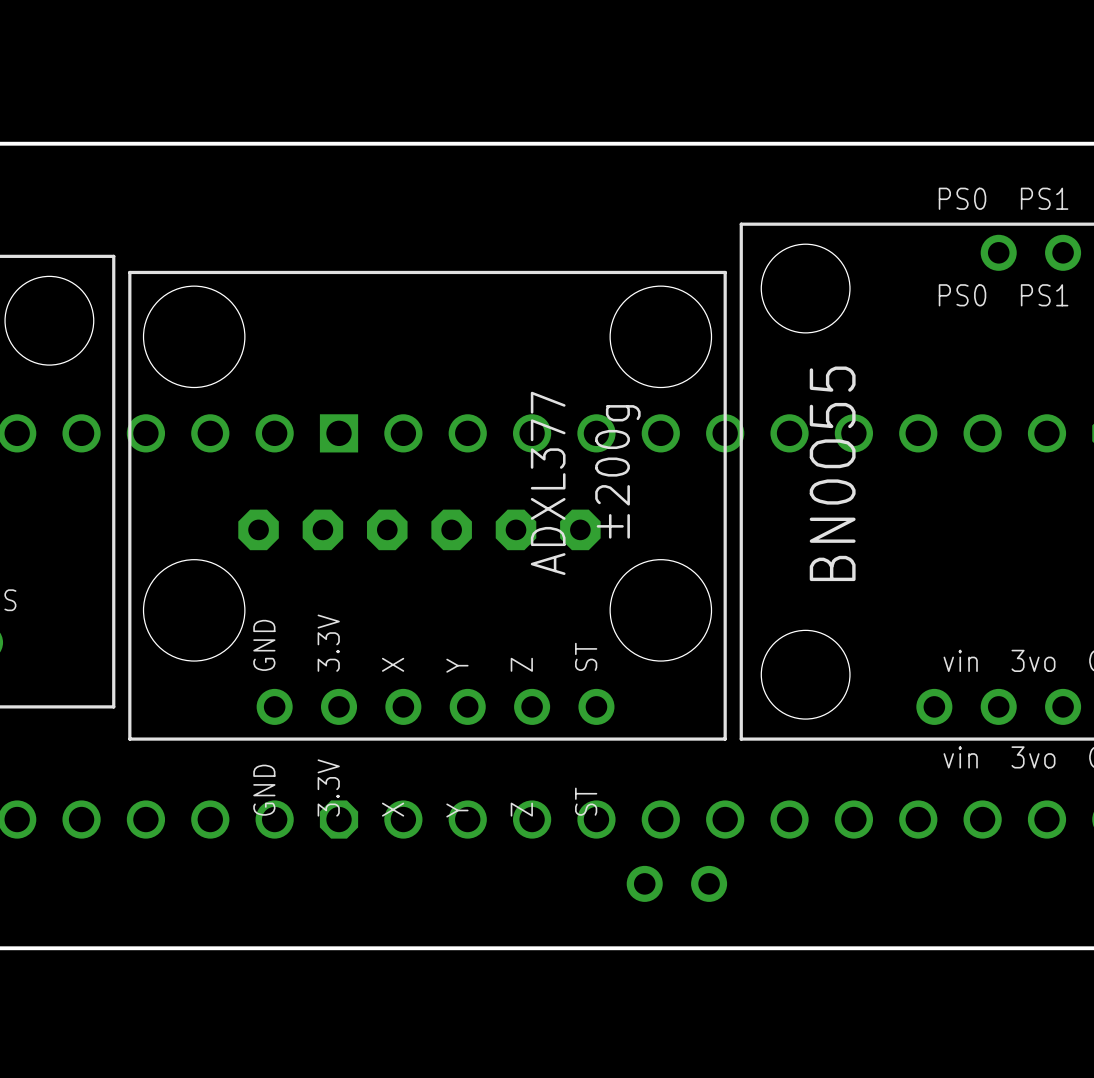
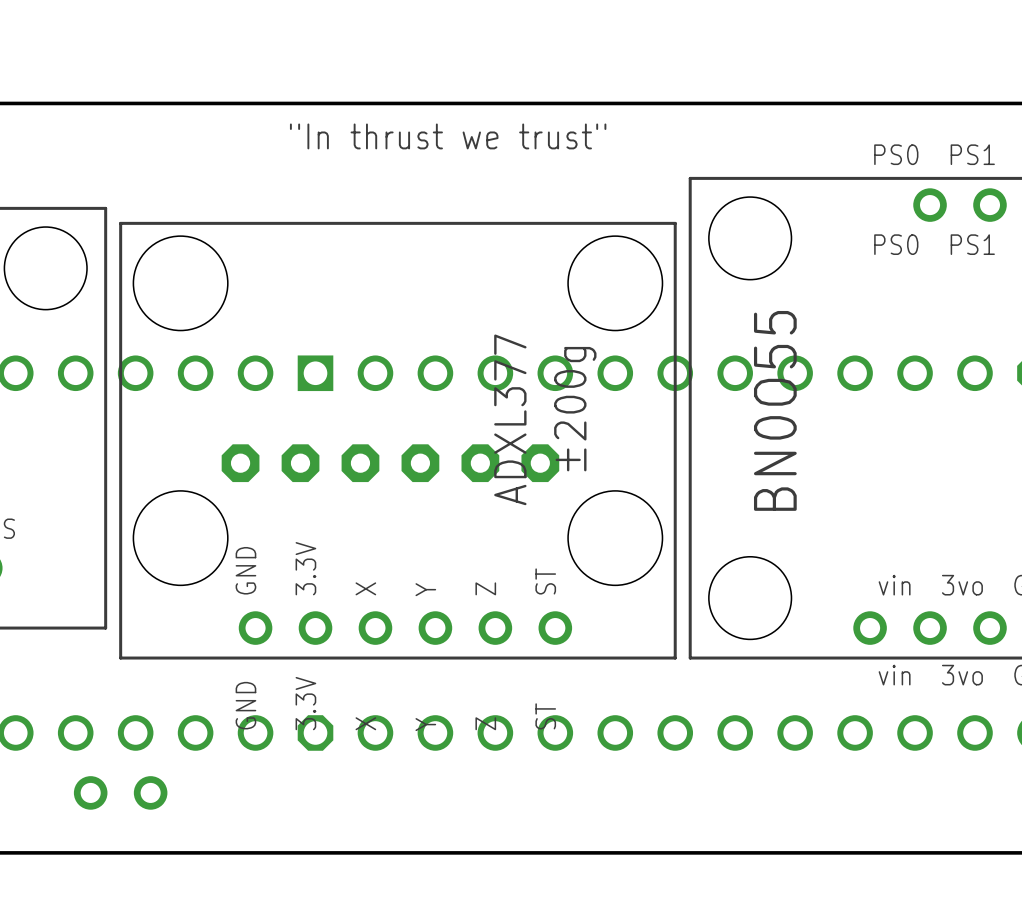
text: none -> "In thrust we trust" (448, 136)
part: none -> (90, 792)
part: none -> (150, 792)
part: (644, 883) -> none
part: (709, 883) -> none

